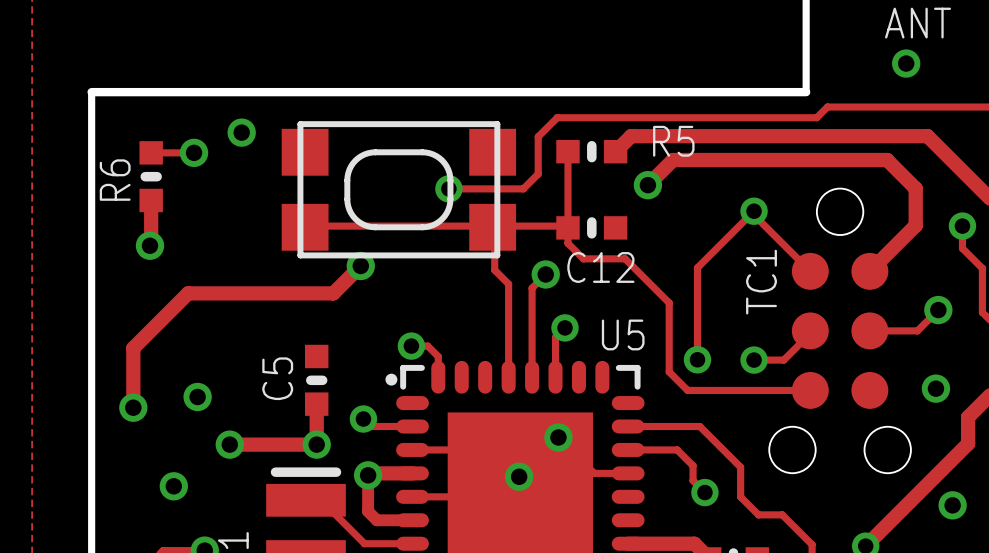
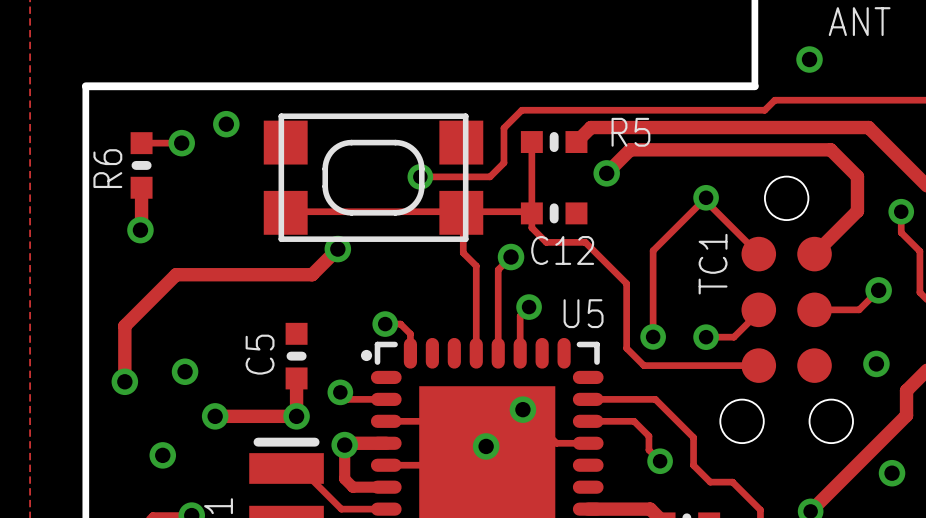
via position: (906, 63) -> (809, 59)

